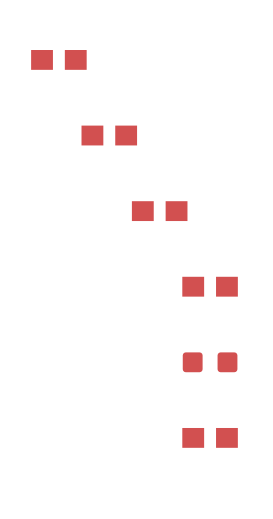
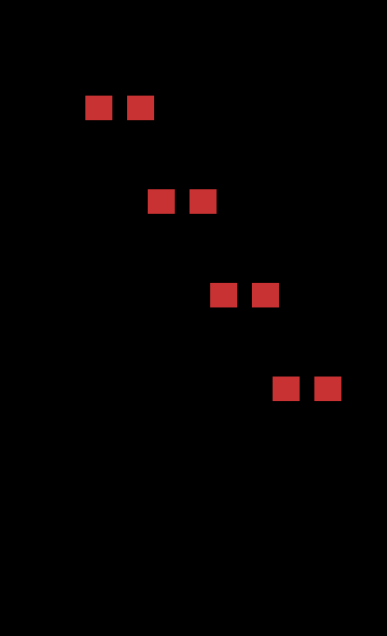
part: (210, 362) -> none
part: (210, 437) -> none

